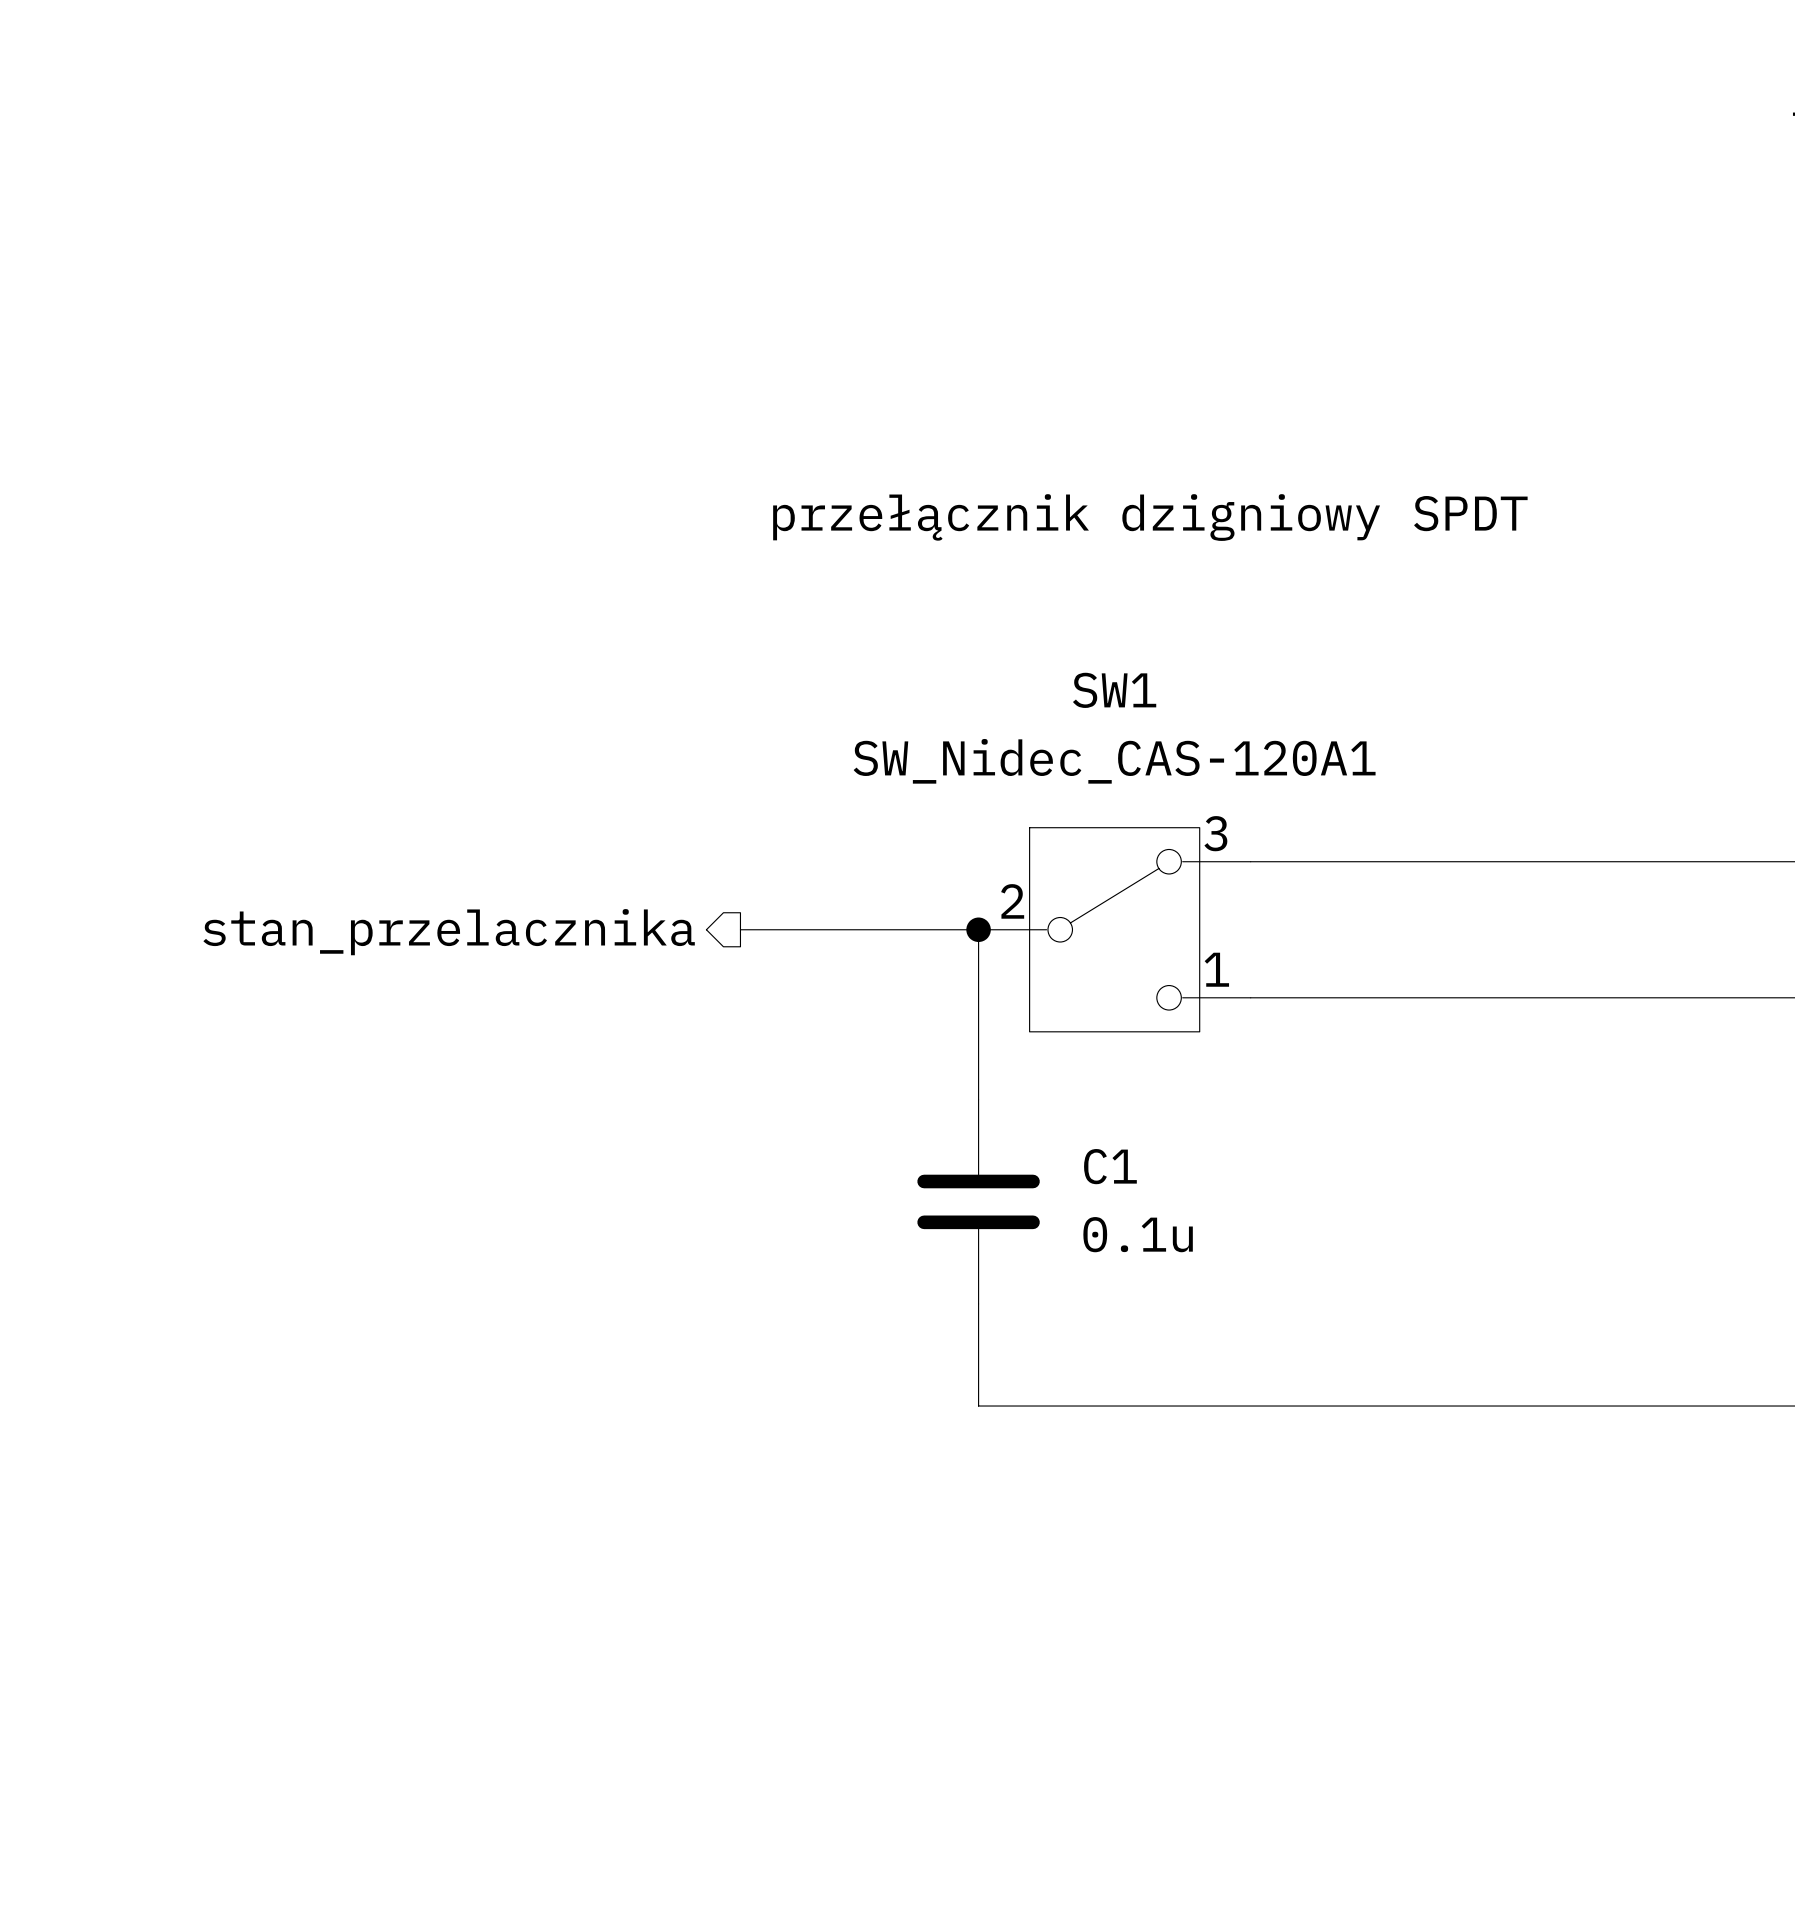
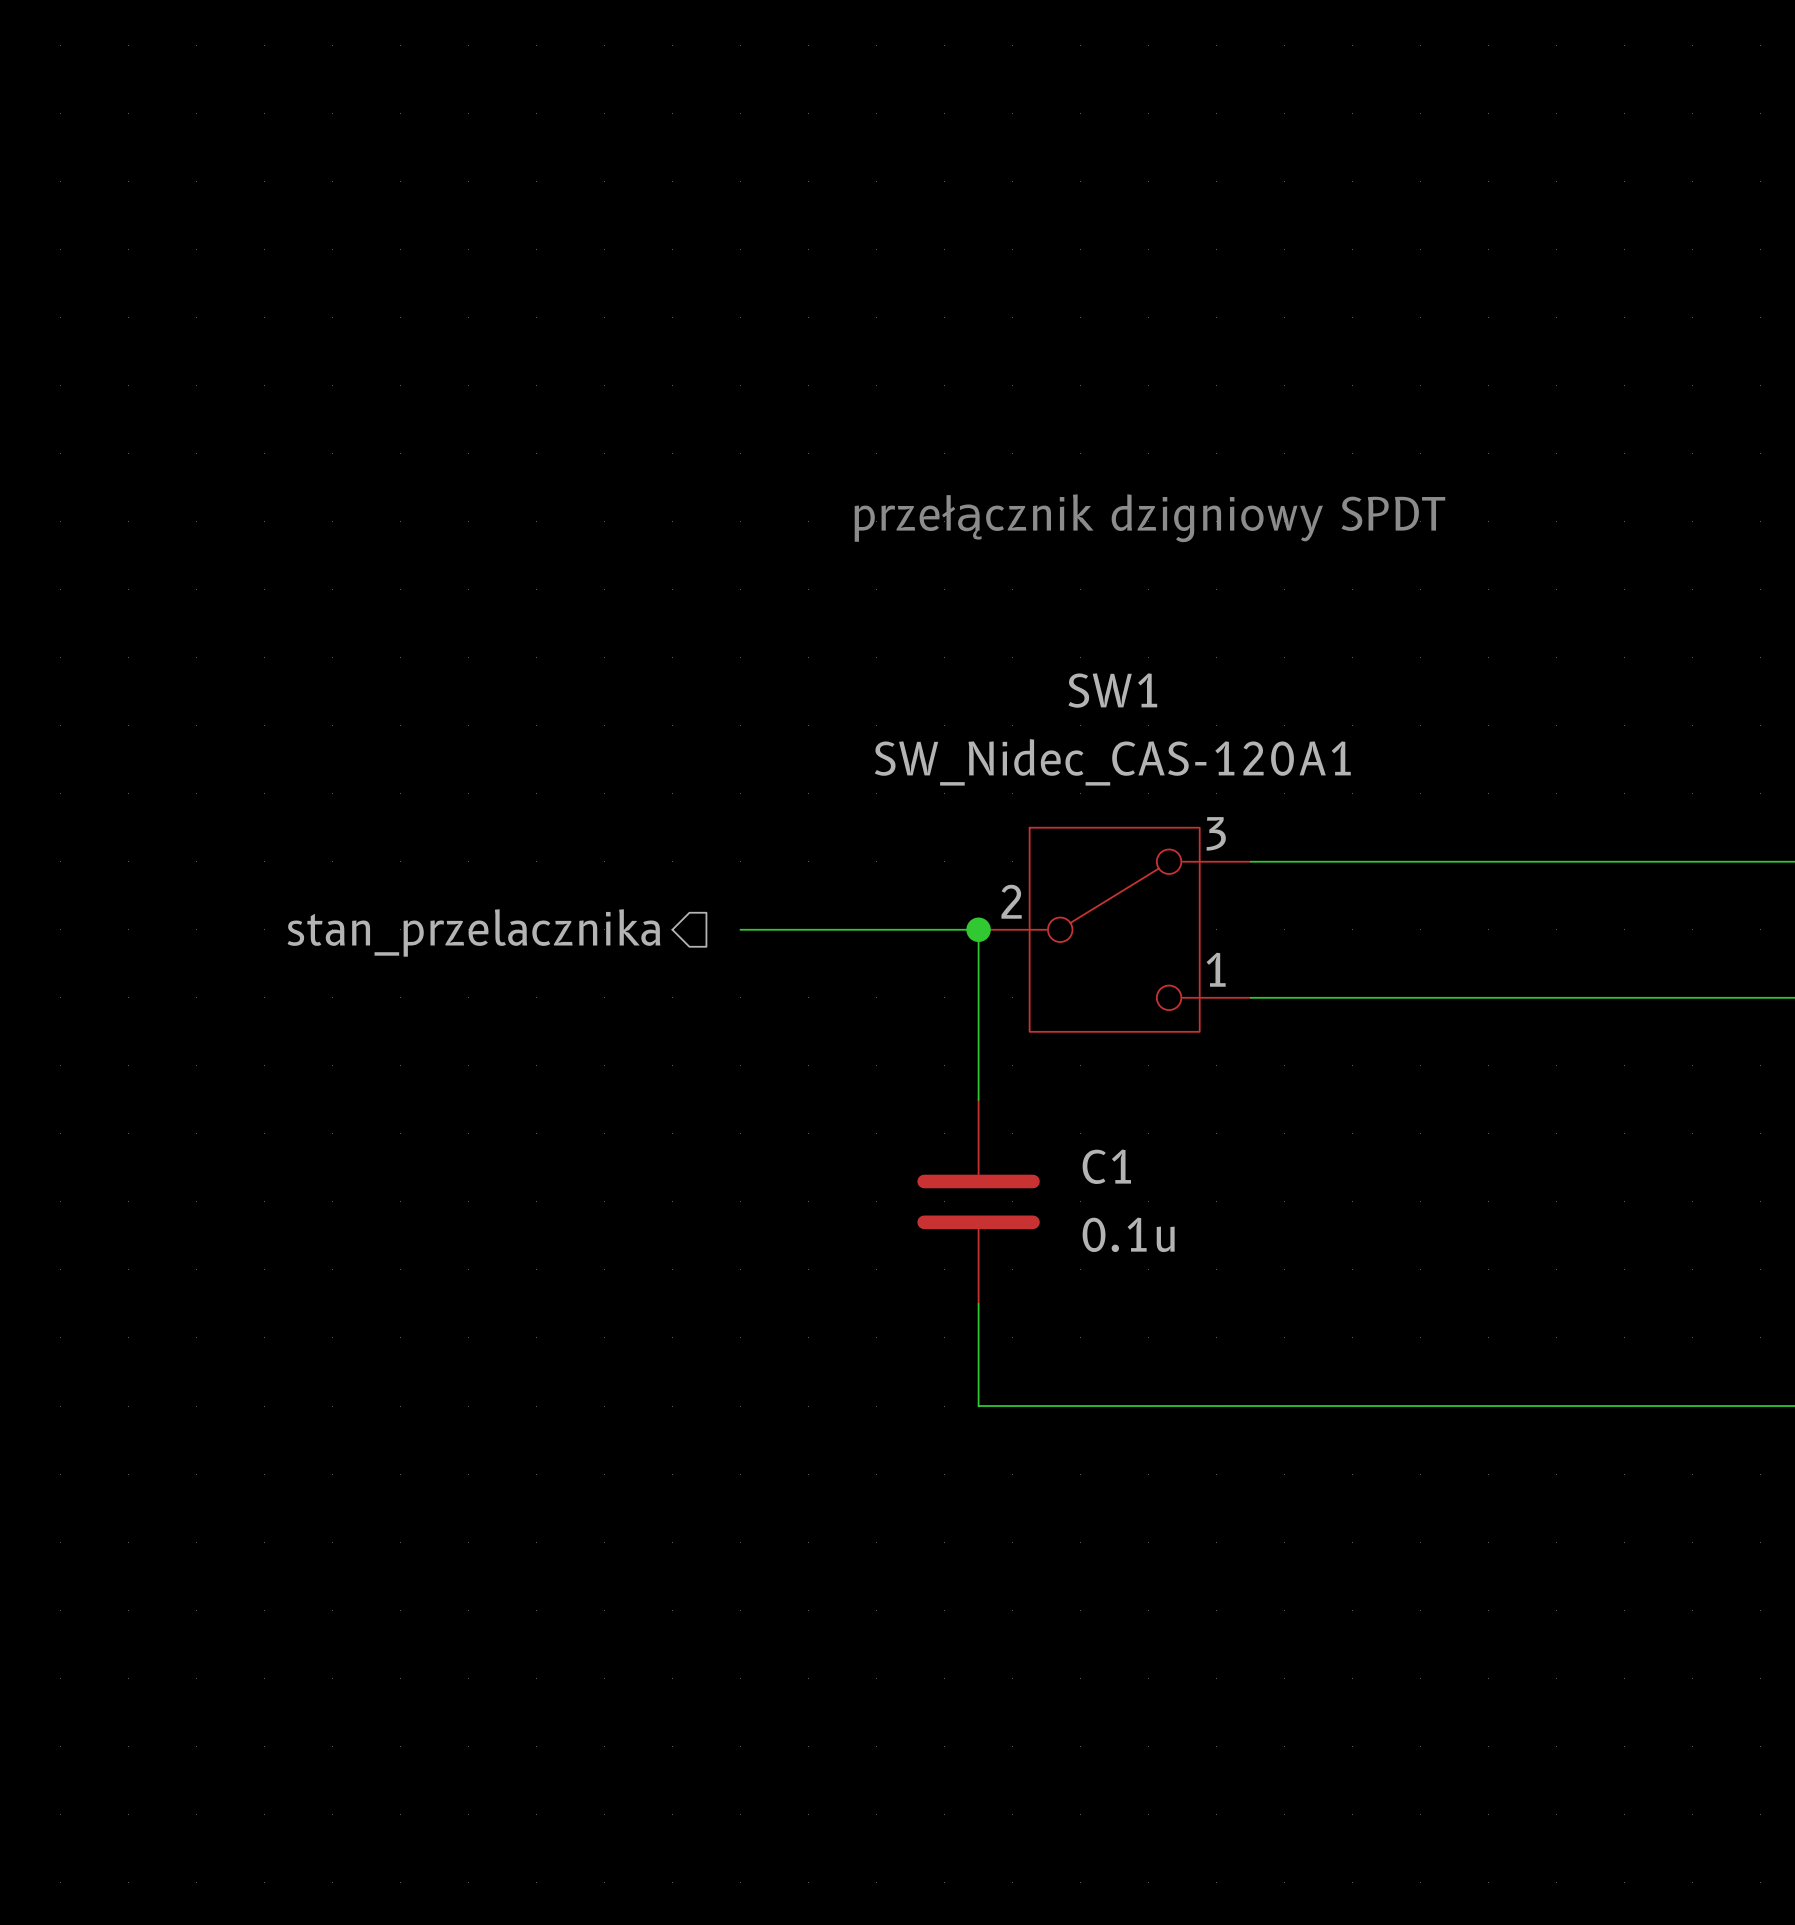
hierarchical label position: stan_przelacznika (449, 932) -> stan_przelacznika (473, 932)

